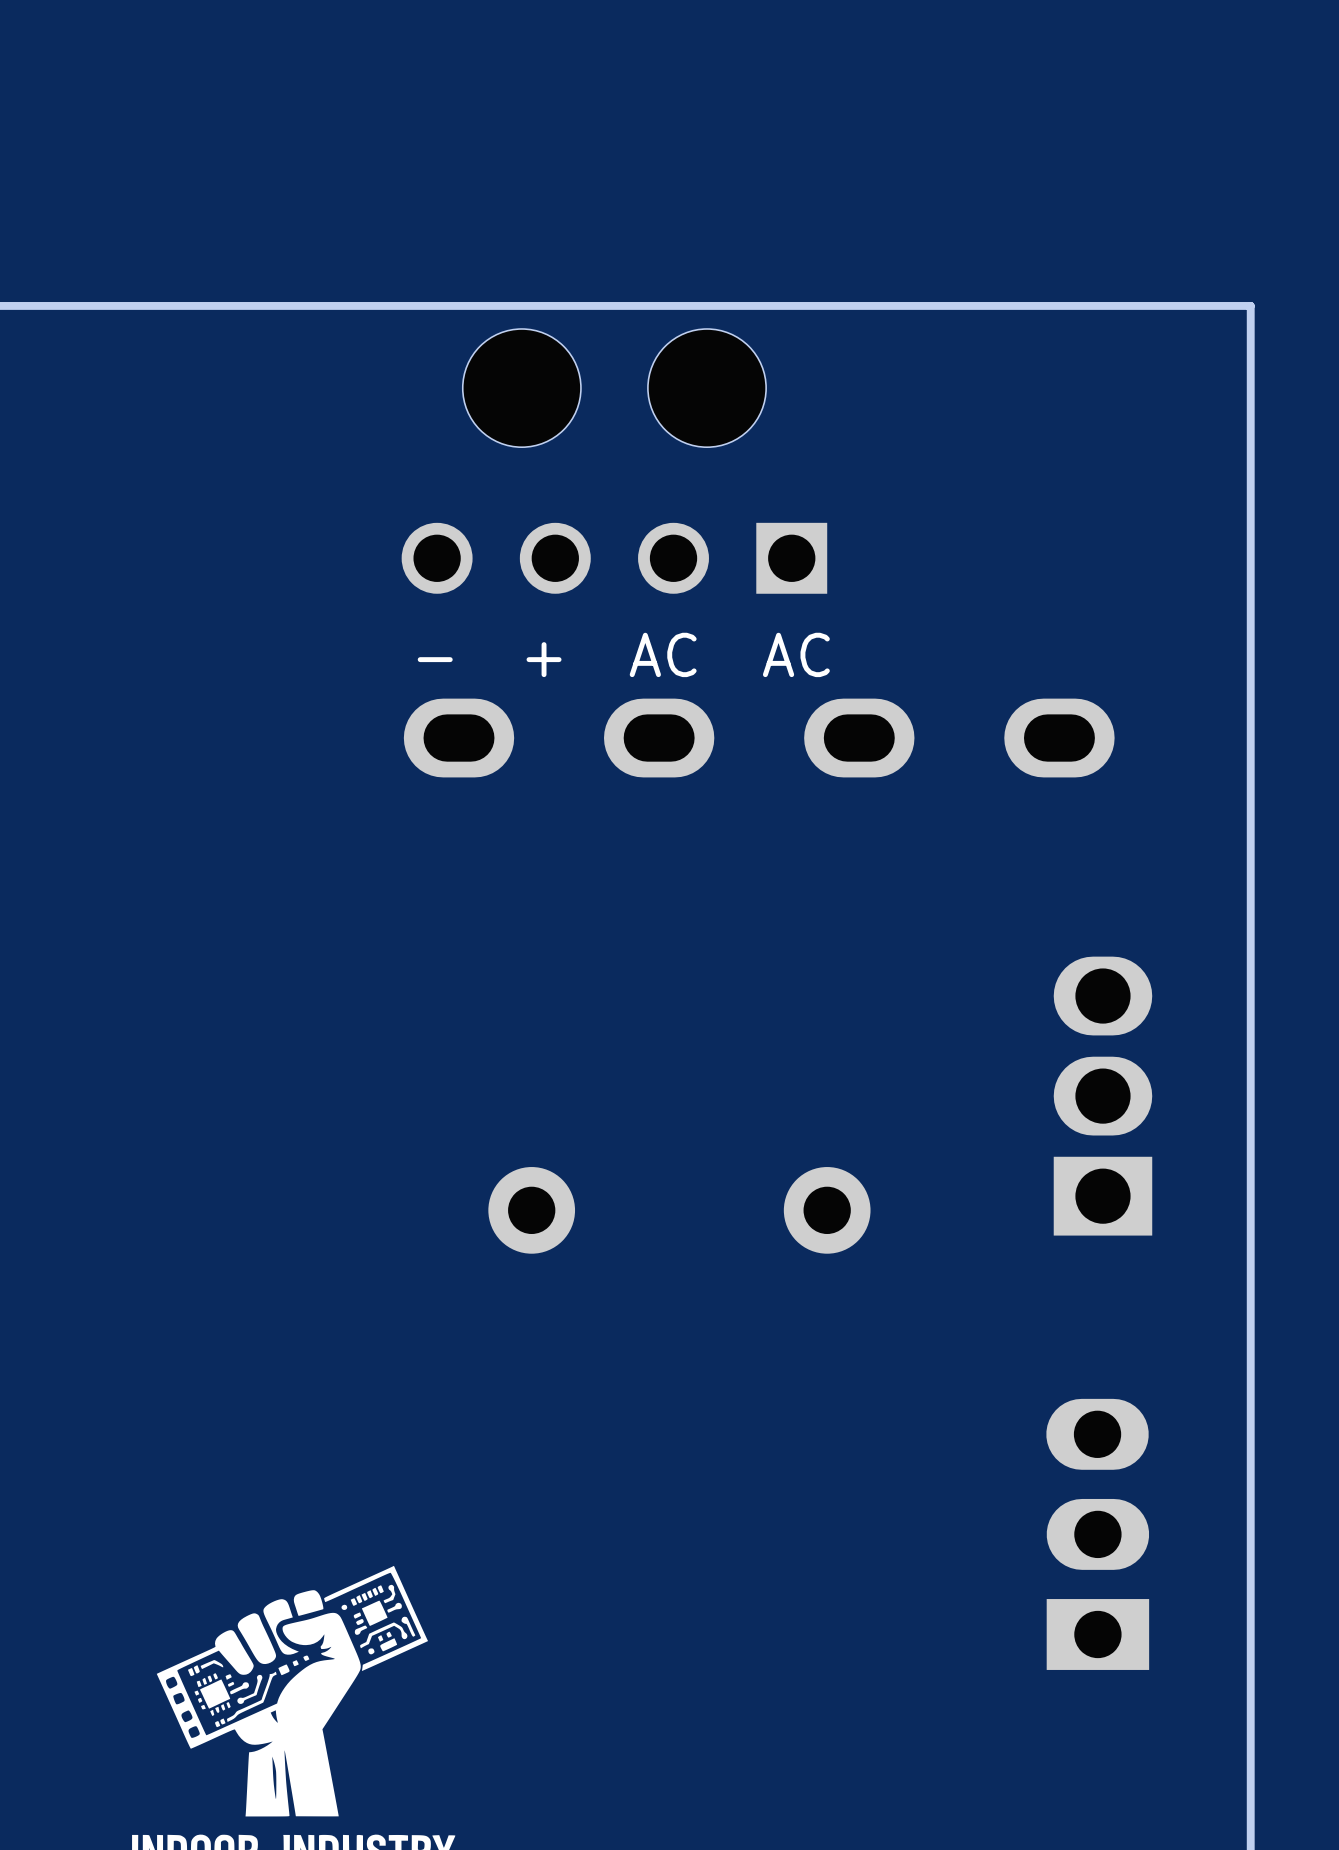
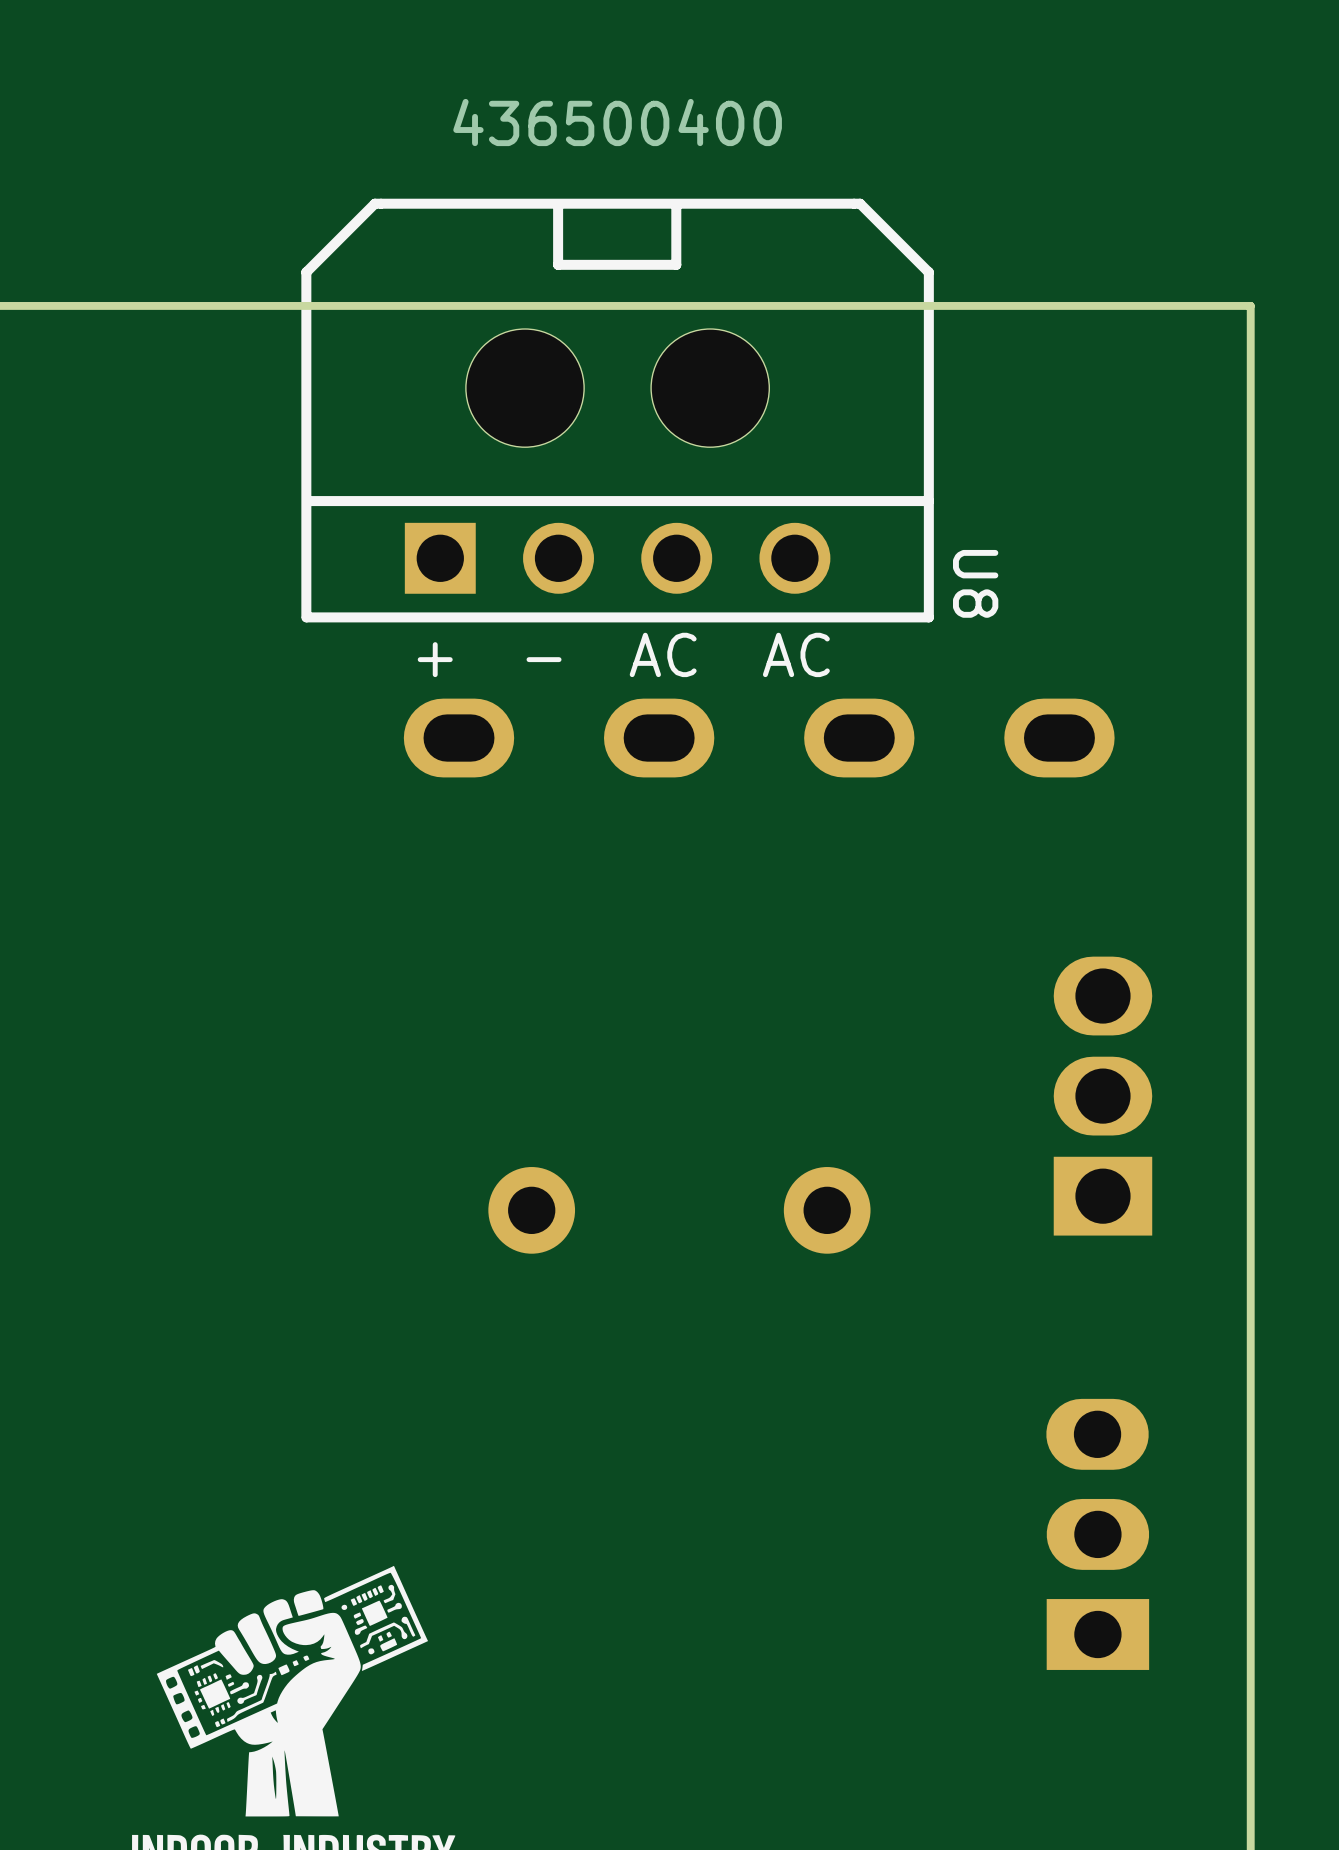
U8 side: top (614, 461) -> bottom (617, 410)
text: - + AC AC (623, 654) -> + - AC AC (623, 654)

